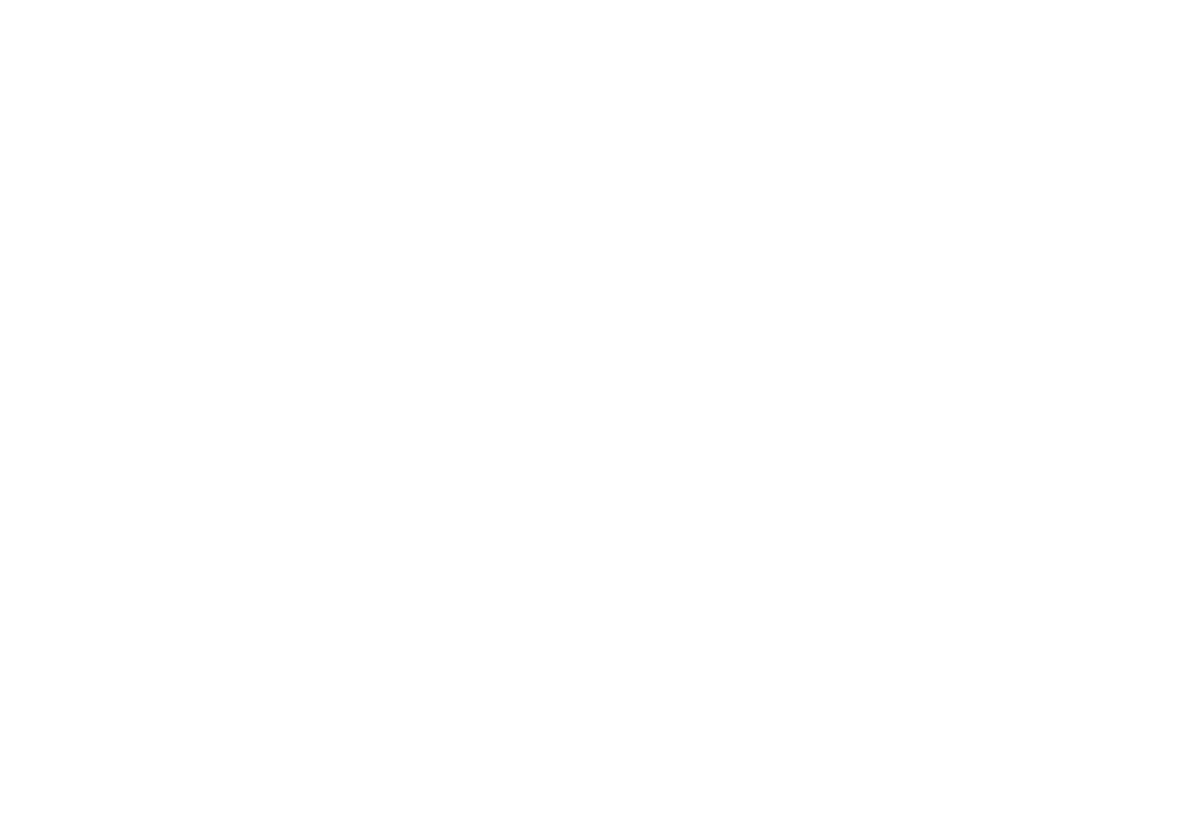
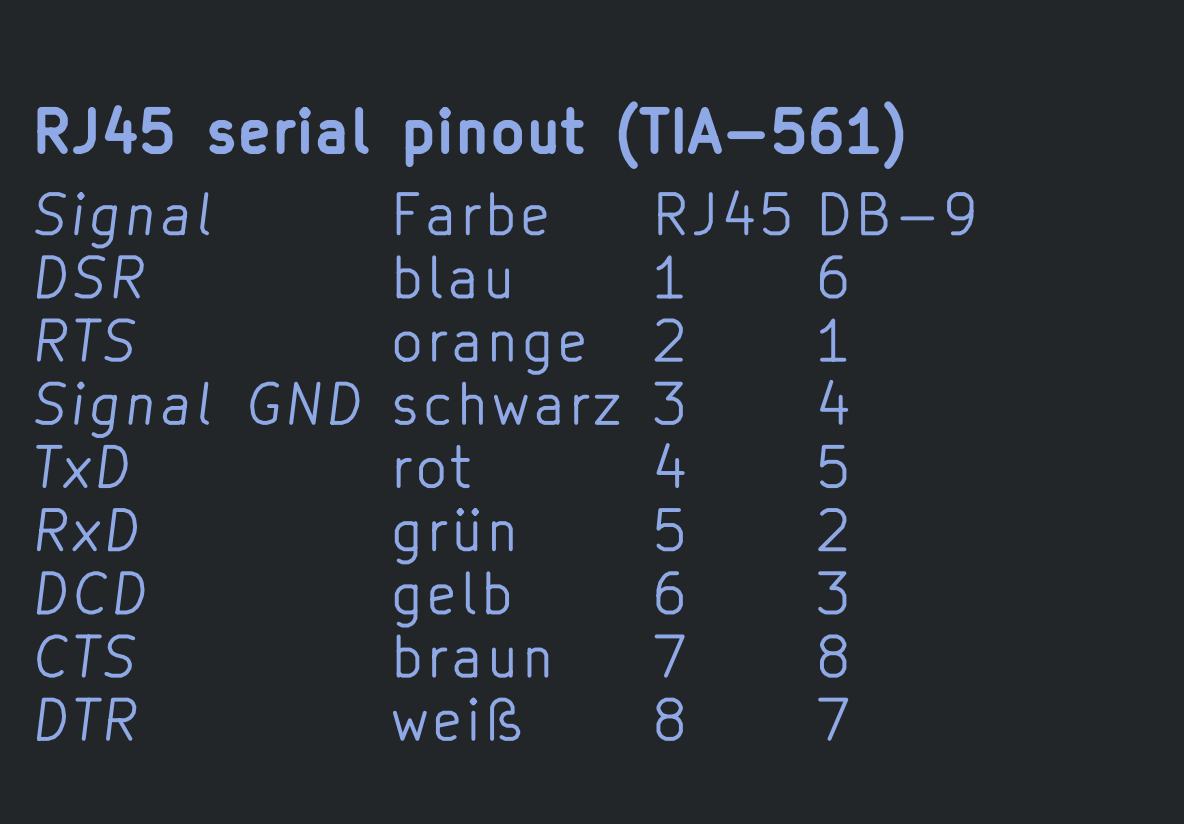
text: none -> RJ45 serial pinout (TIA-561) (470, 135)
text: none -> RJ45 (723, 212)
text: none -> Farbe (471, 213)
text: none -> DB-9 (897, 213)
text: none -> Signal (122, 220)
text: none -> DSR (90, 276)
text: none -> blau (452, 276)
text: none -> 1 (669, 276)
text: none -> 6 (833, 276)
text: none -> RTS (86, 340)
text: none -> 2 (668, 340)
text: none -> 1 (833, 340)
text: none -> orange (489, 353)
text: none -> 4 (834, 402)
text: none -> schwarz (507, 403)
text: none -> 3 (668, 403)
text: none -> Signal GND (197, 409)
text: none -> 4 (670, 465)
text: none -> TxD (81, 466)
text: none -> rot (433, 466)
text: none -> 5 (833, 466)
text: none -> RxD (86, 529)
text: none -> 5 (669, 529)
text: none -> 2 (832, 529)
text: none -> grün (453, 536)
text: none -> DCD (90, 592)
text: none -> 6 (669, 592)
text: none -> 3 (832, 592)
text: none -> gelb (451, 599)
text: none -> CTS (86, 656)
text: none -> braun (472, 656)
text: none -> 7 (669, 656)
text: none -> 8 (833, 656)
text: none -> DTR (86, 719)
text: none -> weiß (456, 719)
text: none -> 8 (669, 719)
text: none -> 7 (833, 719)

